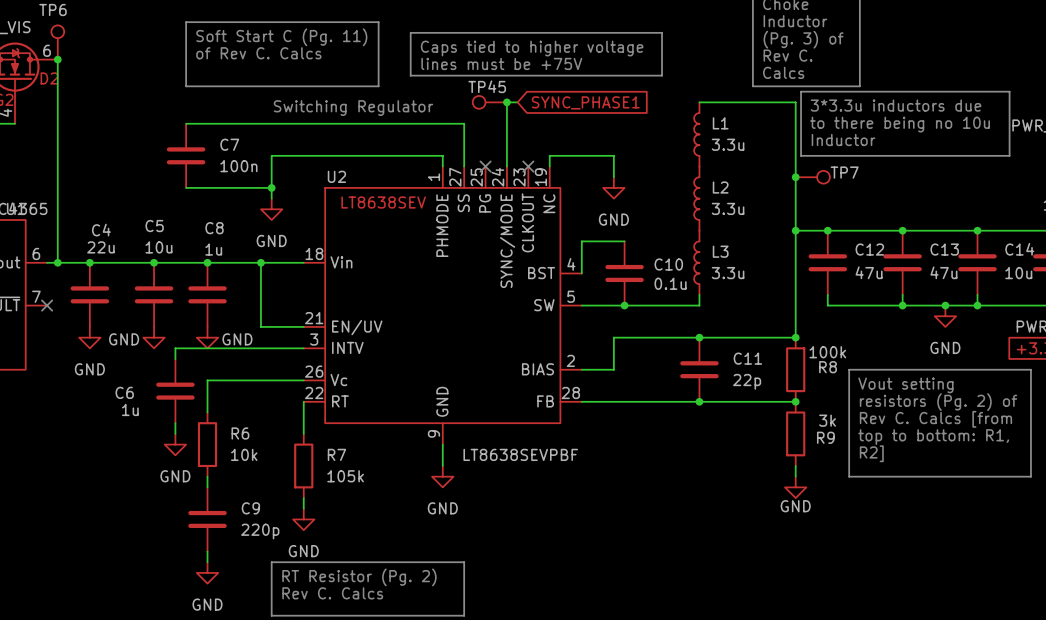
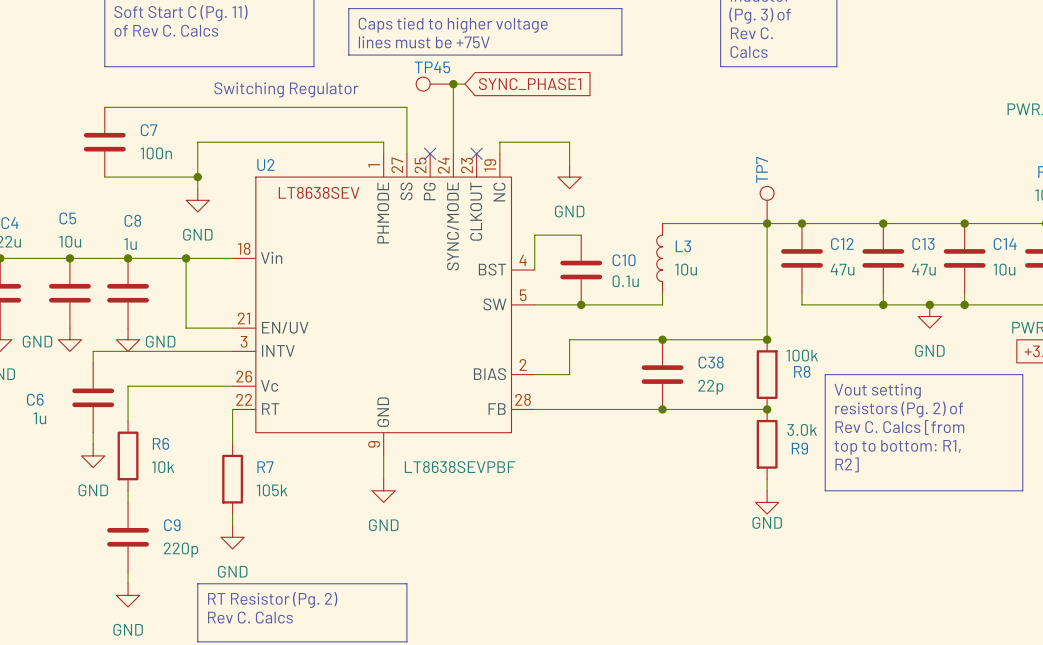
line: (801, 91) (1009, 91) (1009, 155) (801, 155) (801, 91) -> none
wire: (699, 102) (795, 102) (795, 230) -> (662, 223) (767, 223)
text: 3*3.3u inductors due (895, 105) -> none
text: to there being no 10u (900, 124) -> none
L1: 3.3u (696, 134) -> none
text: Inductor (843, 139) -> none
junction: (795, 177) -> none
TP7 position: (812, 177) -> (767, 204)
TP7 rotation: 0° (823, 177) -> 90° counterclockwise (767, 193)
L2: 3.3u (696, 198) -> none
L3 value: 3.3u (728, 273) -> 10u (686, 269)
C11 name: C11 (747, 358) -> C38 (711, 362)
R9 value: 3k (827, 420) -> 3.0k (802, 429)

